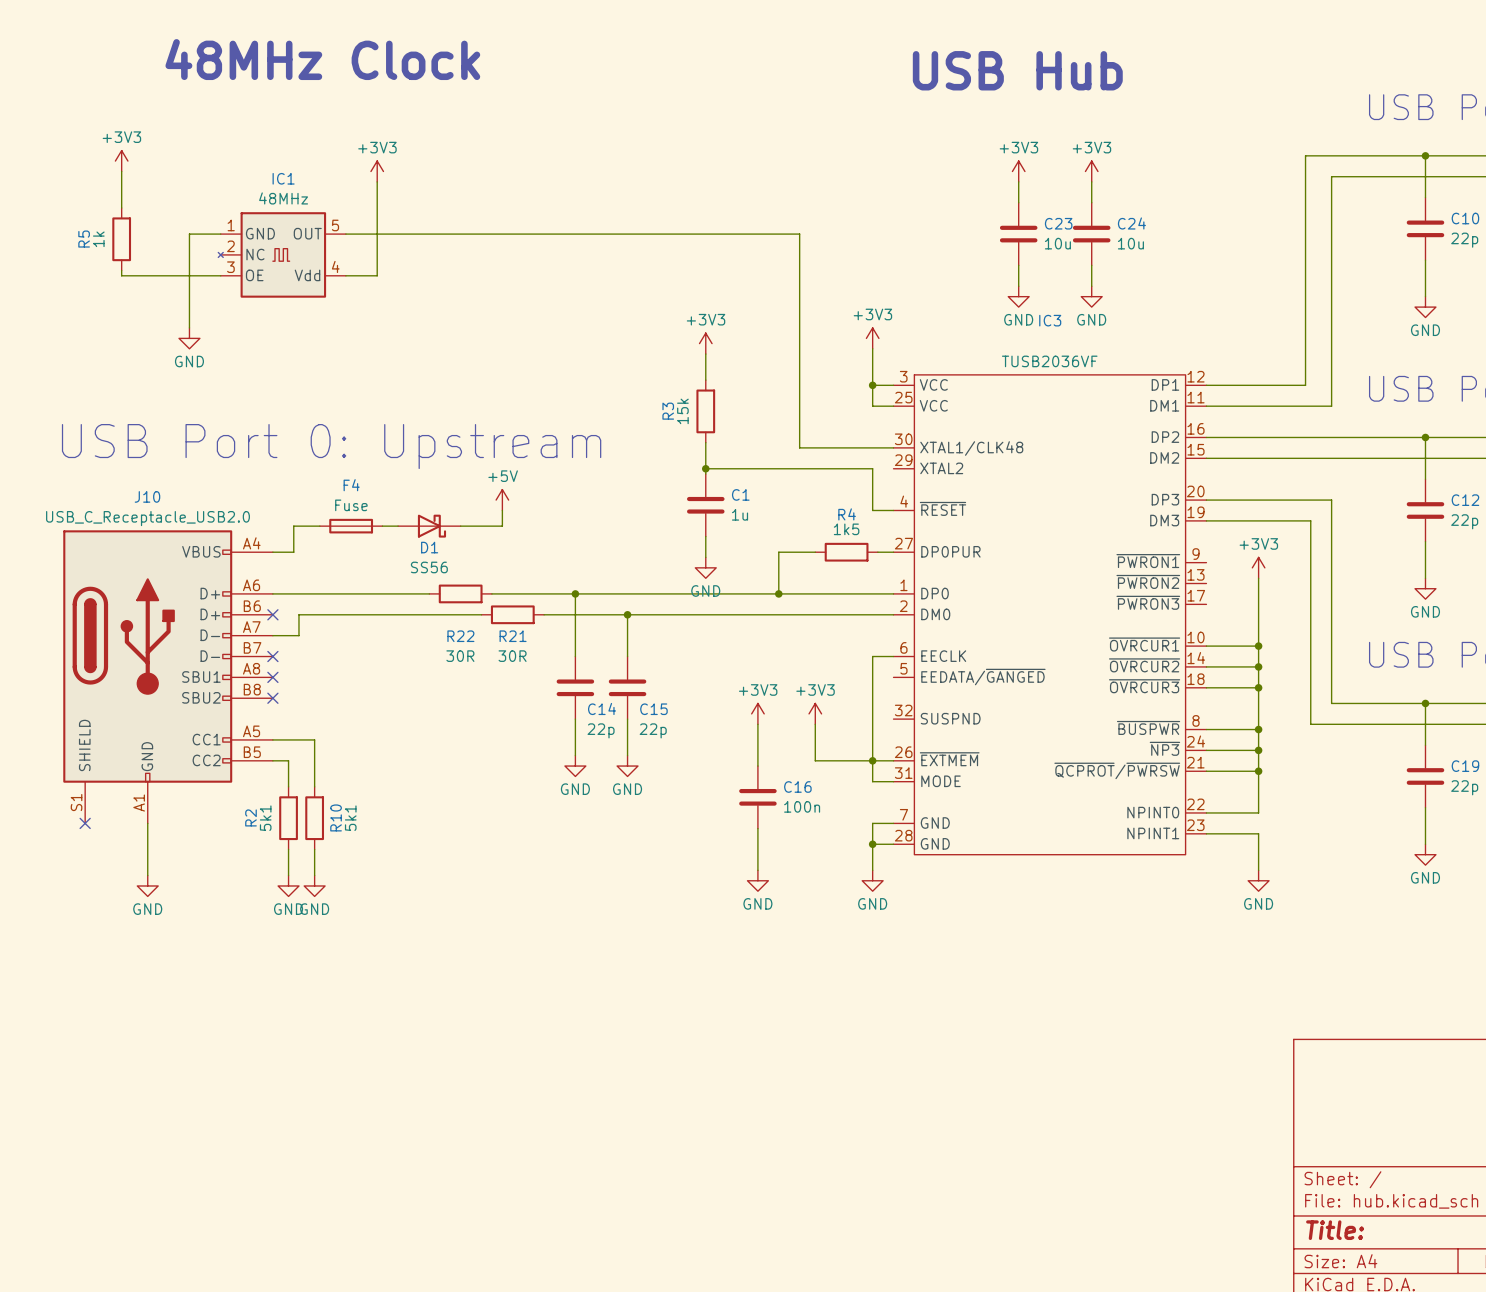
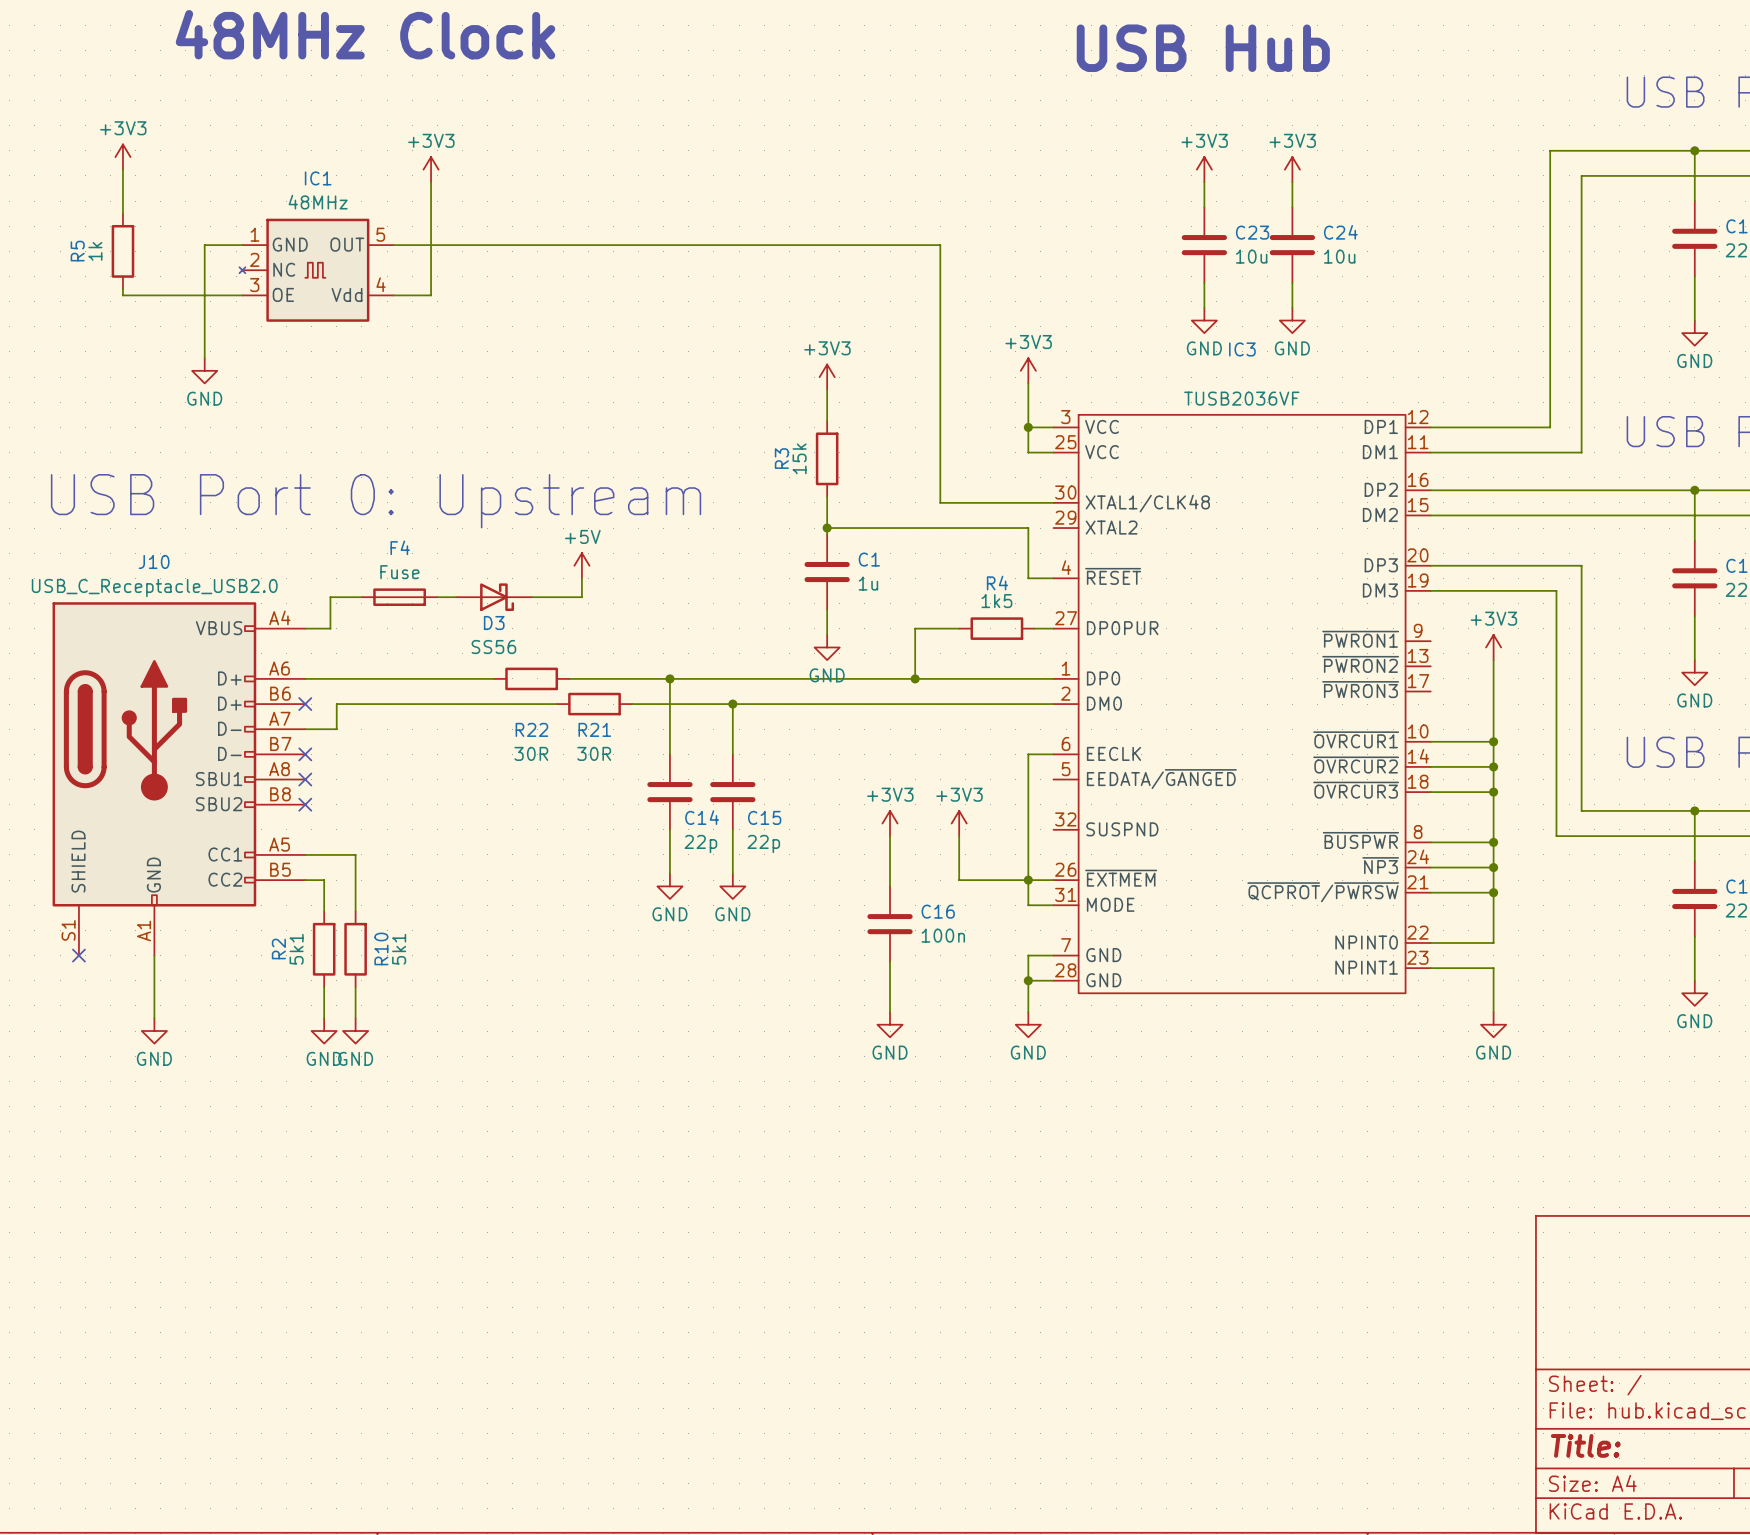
D1 name: D1 (429, 547) -> D3 (494, 623)

